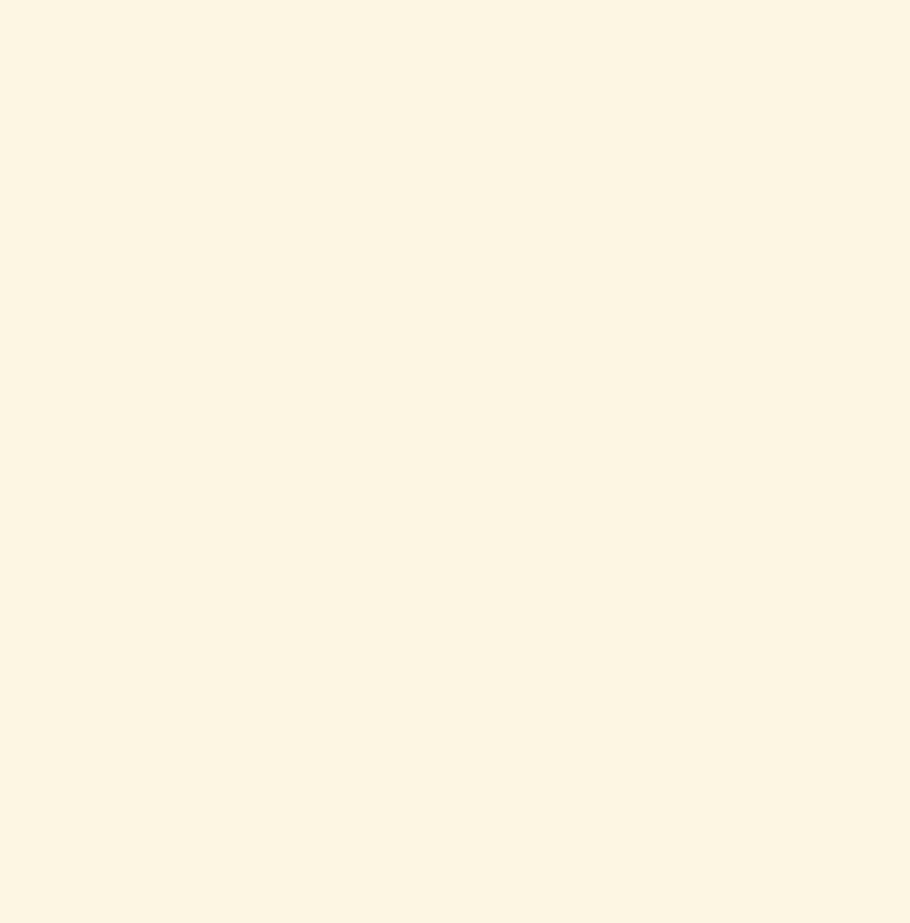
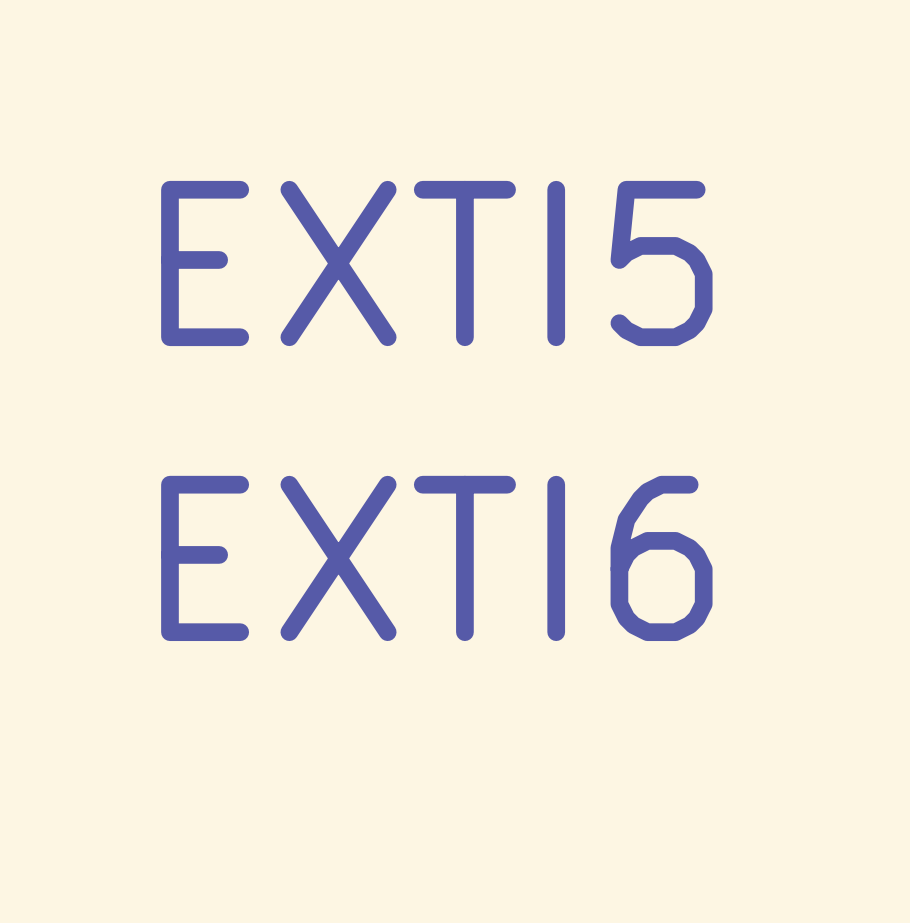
text: none -> EXTI5 (436, 263)
text: none -> EXTI6 (436, 558)

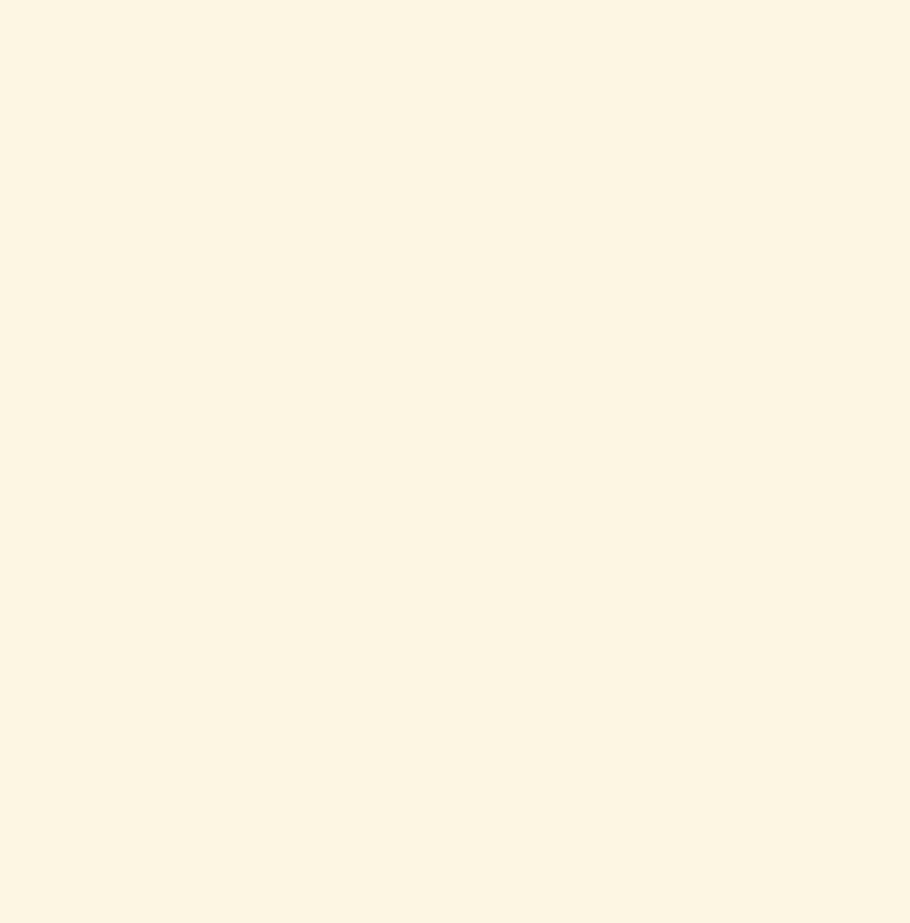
text: EXTI5 (436, 263) -> none
text: EXTI6 (436, 558) -> none

